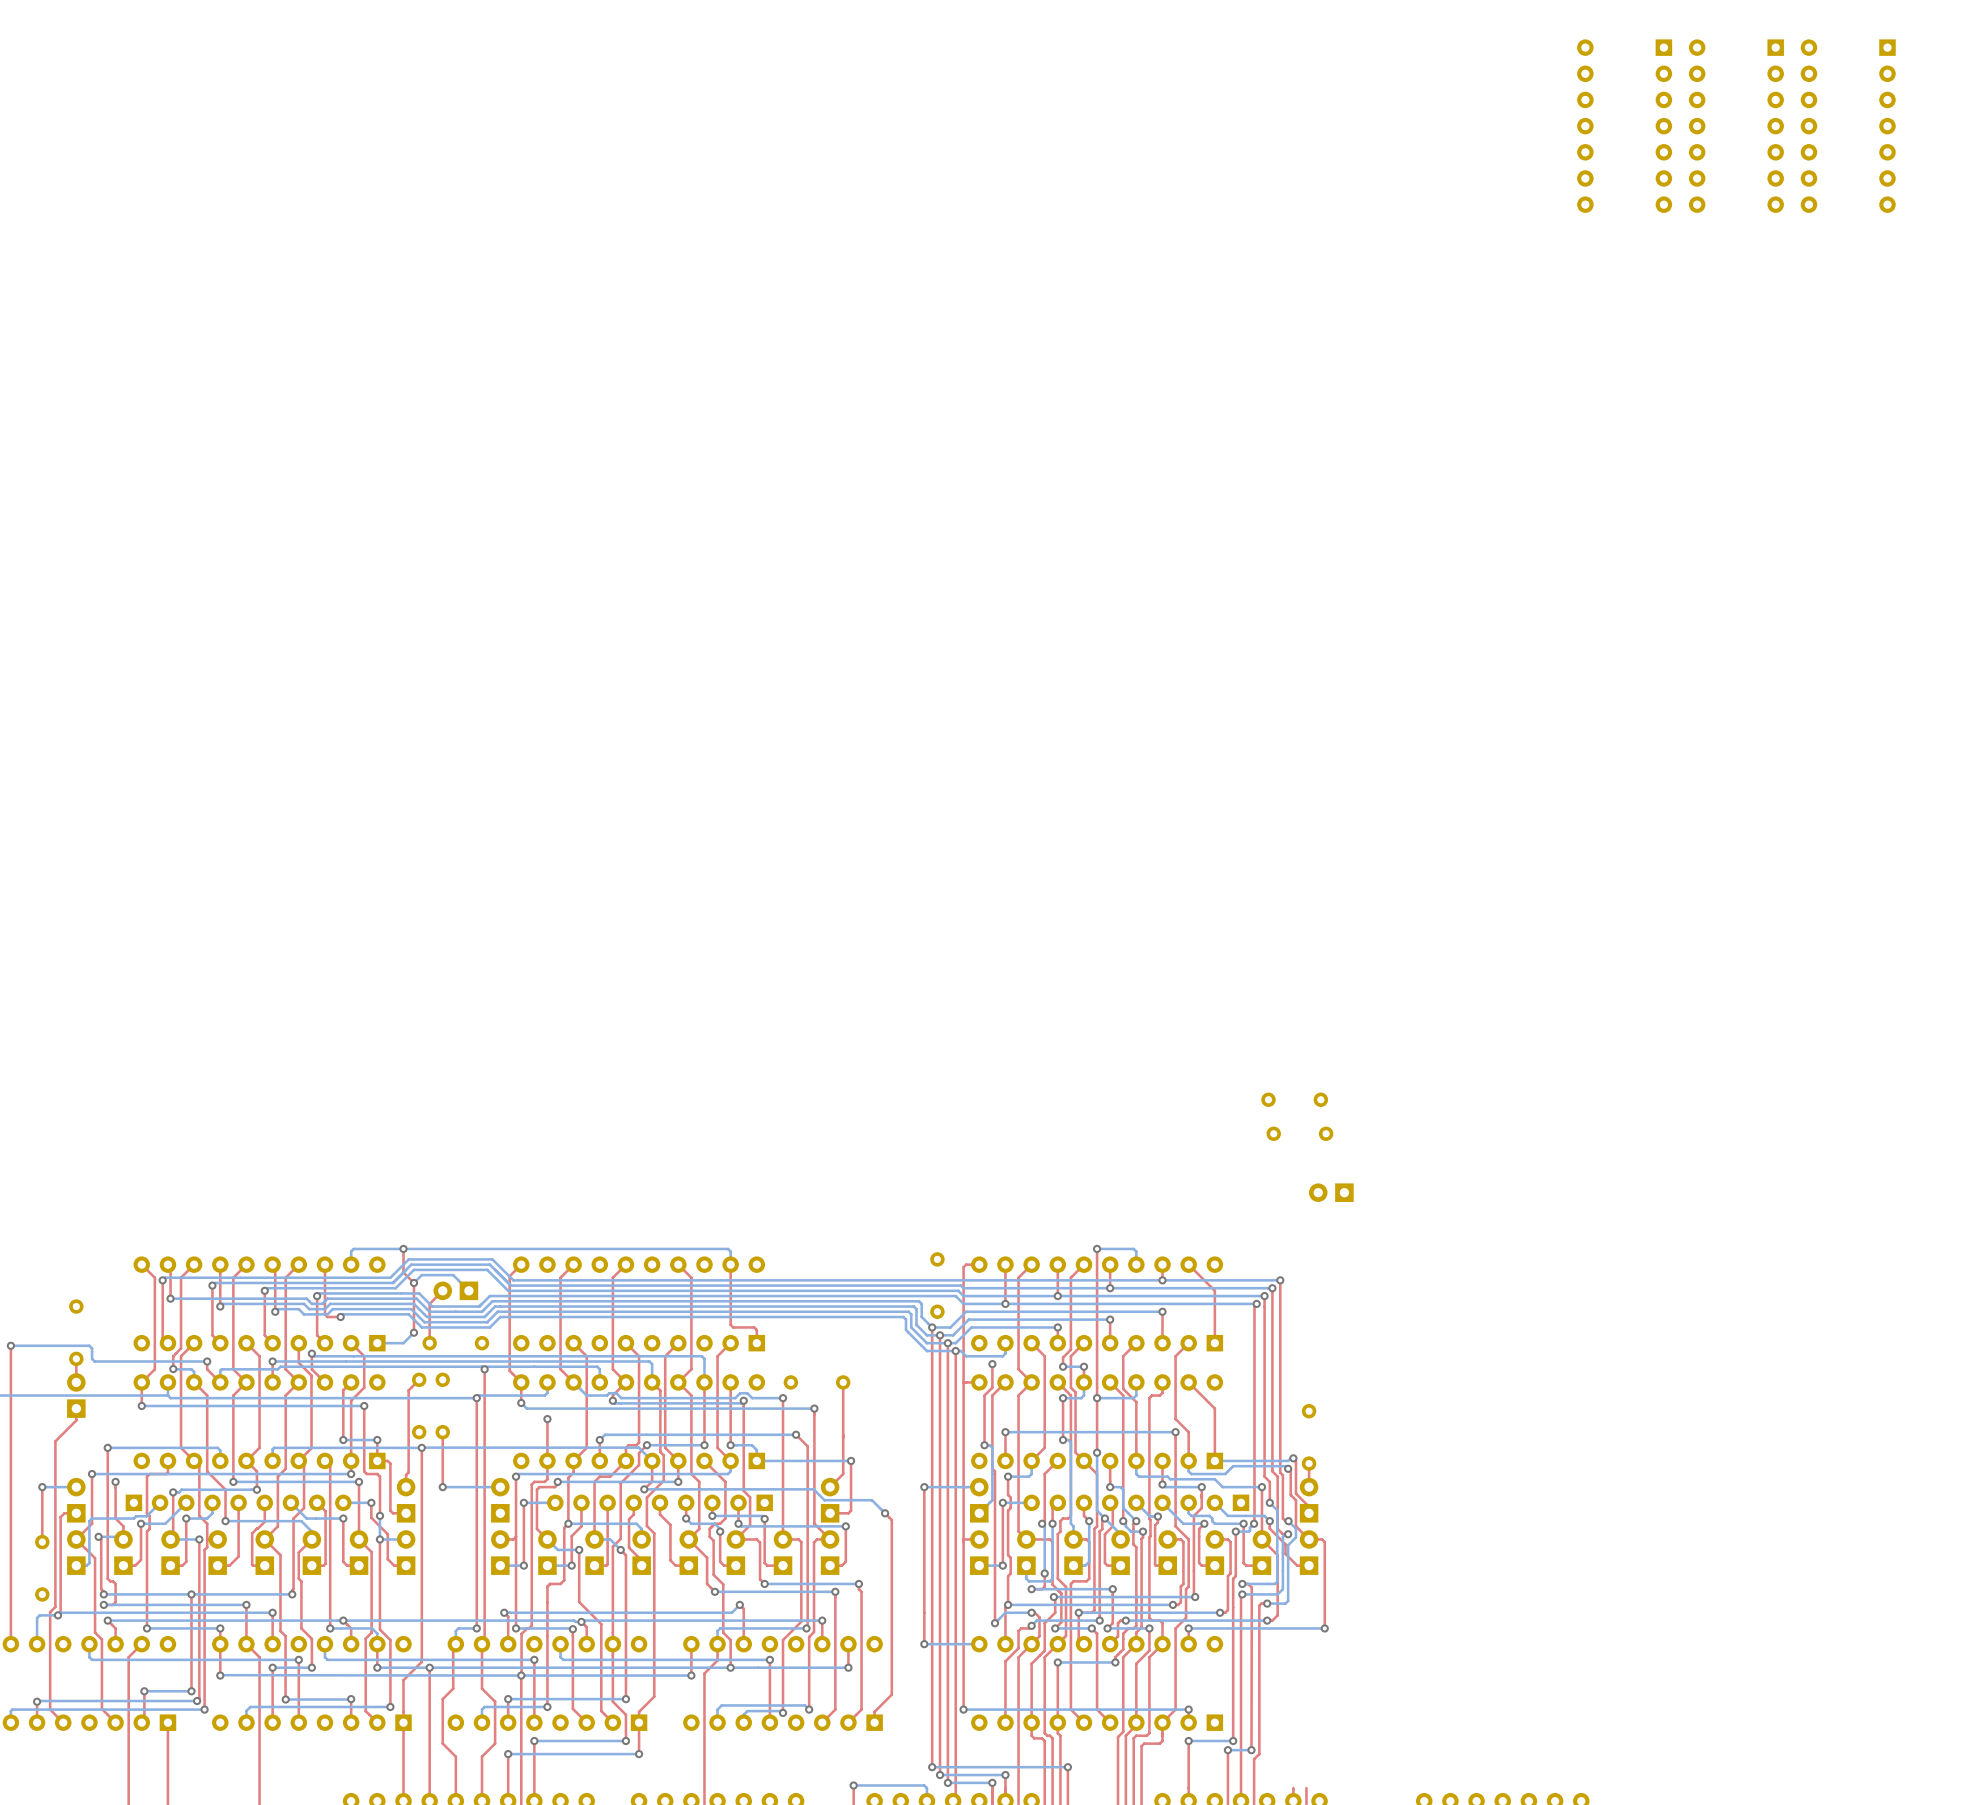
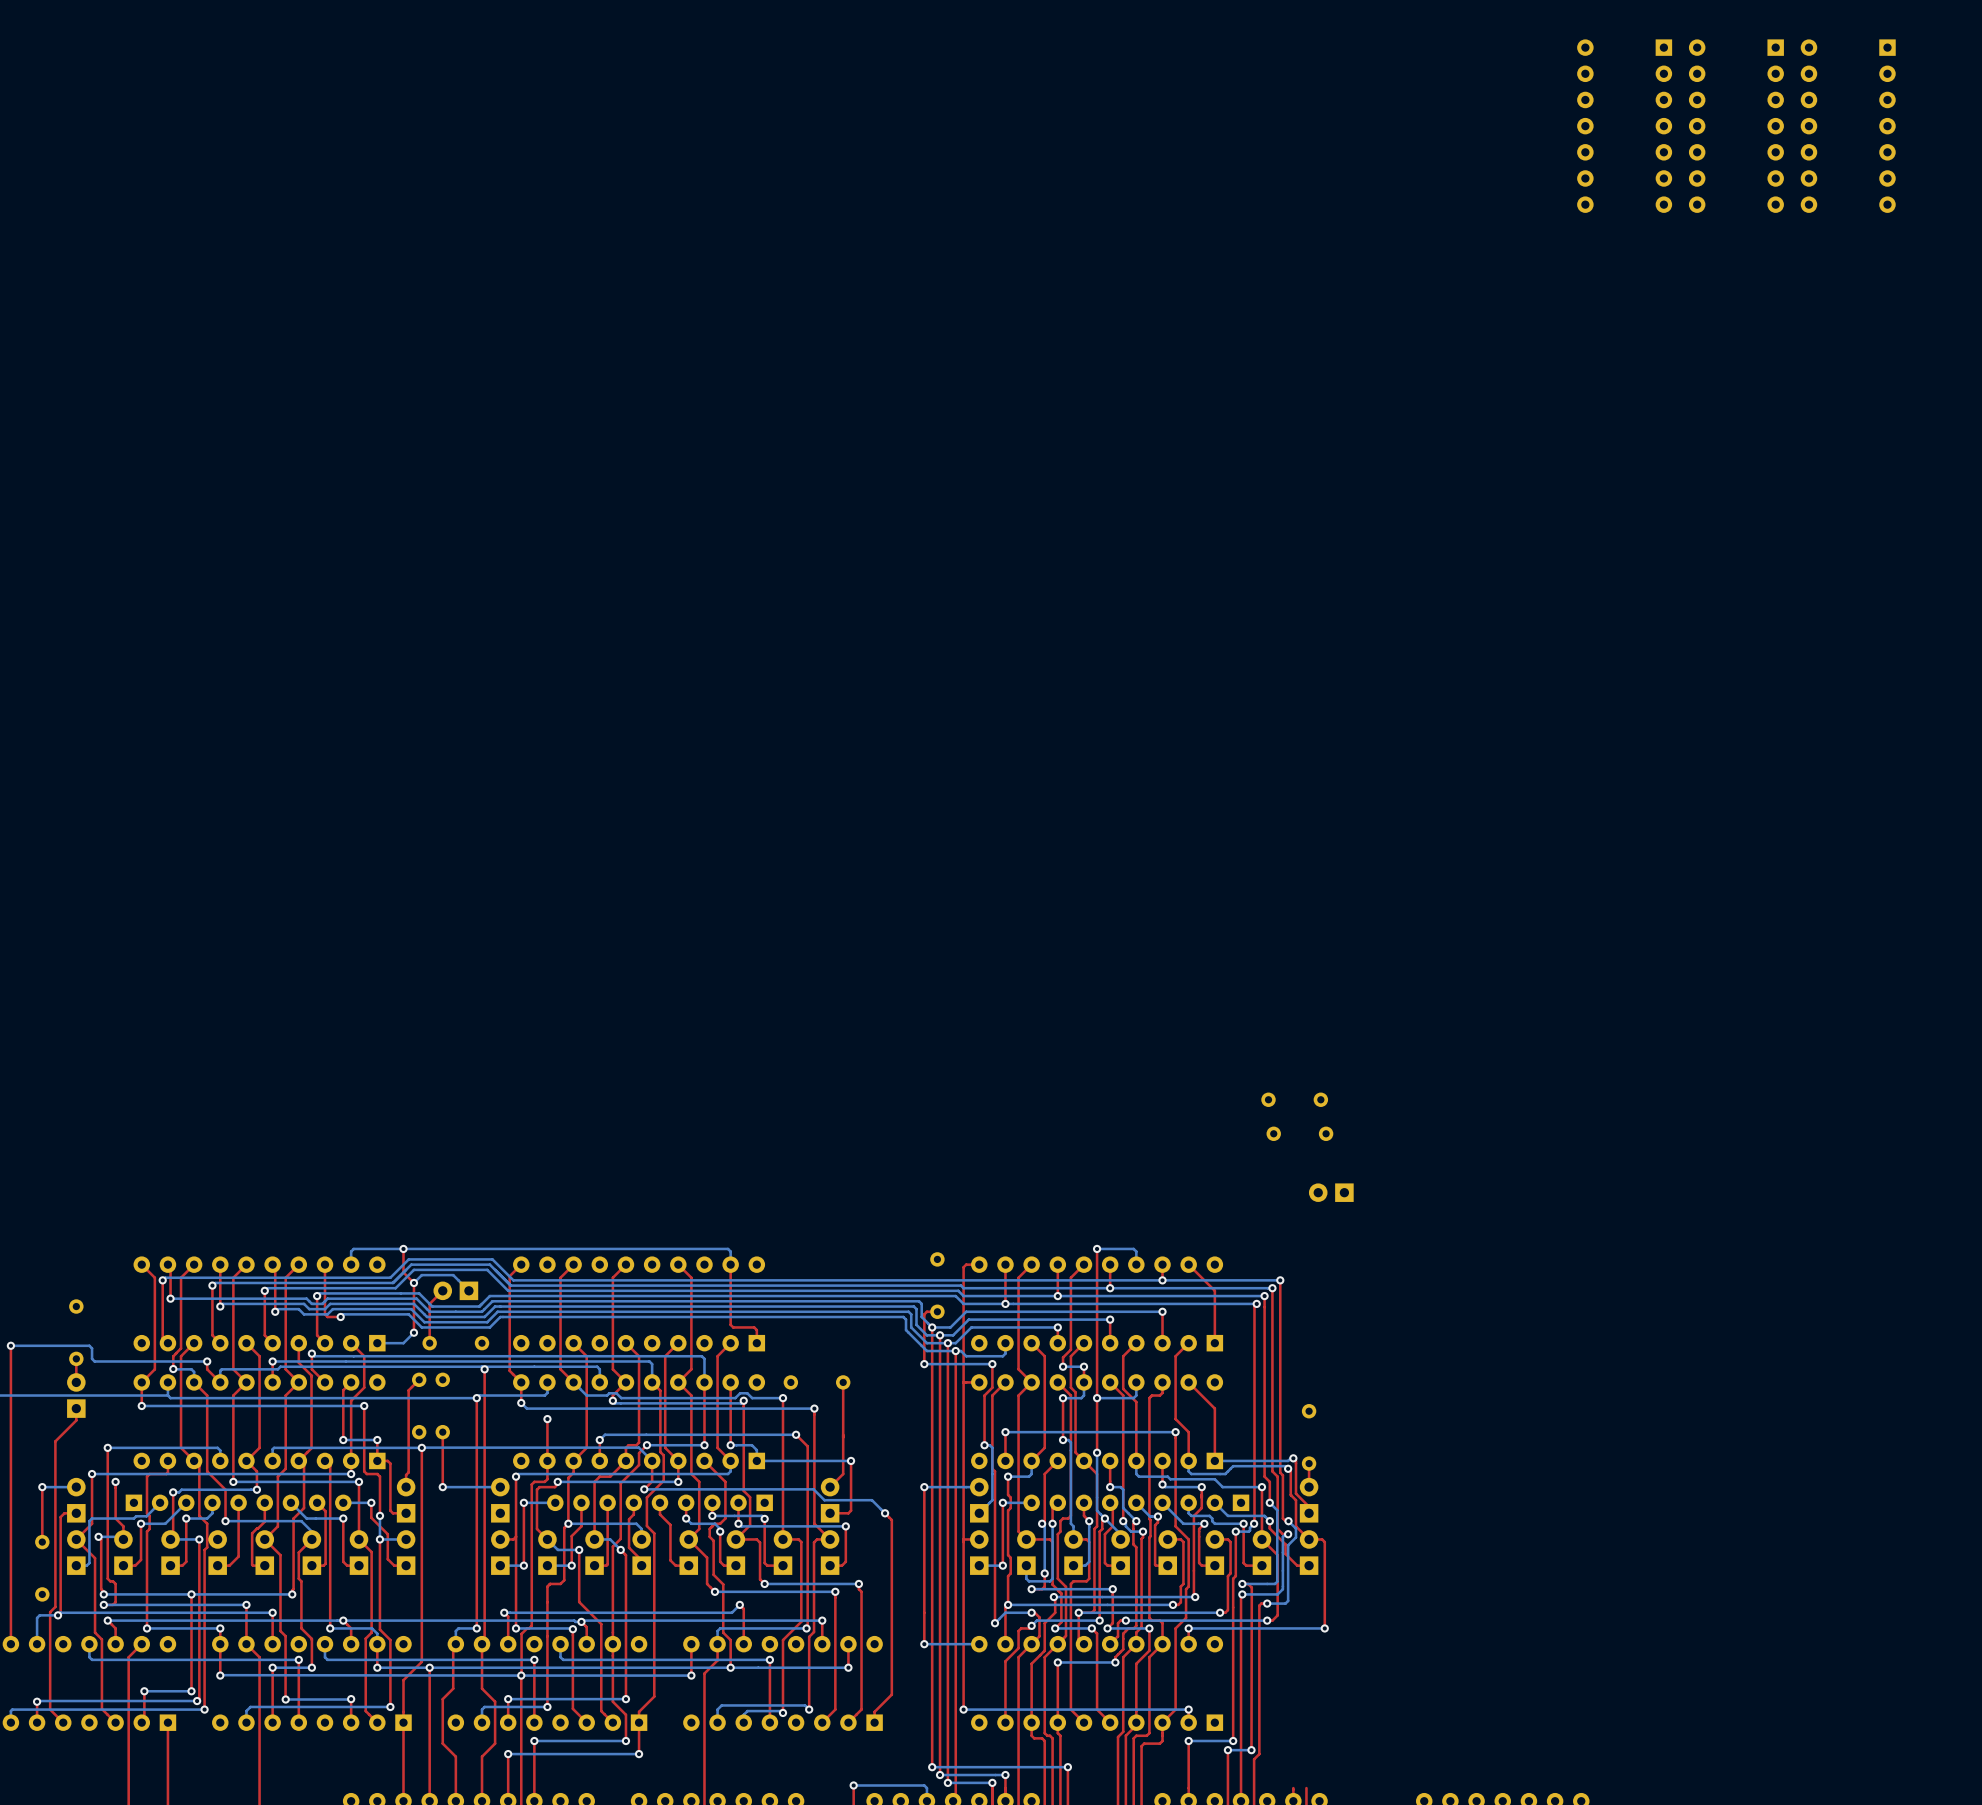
top track: none -> (937, 1311) (926, 1311) (924, 1314) (924, 1364)
via: none -> (924, 1364)
bottom track: none -> (992, 1364) (924, 1364)

